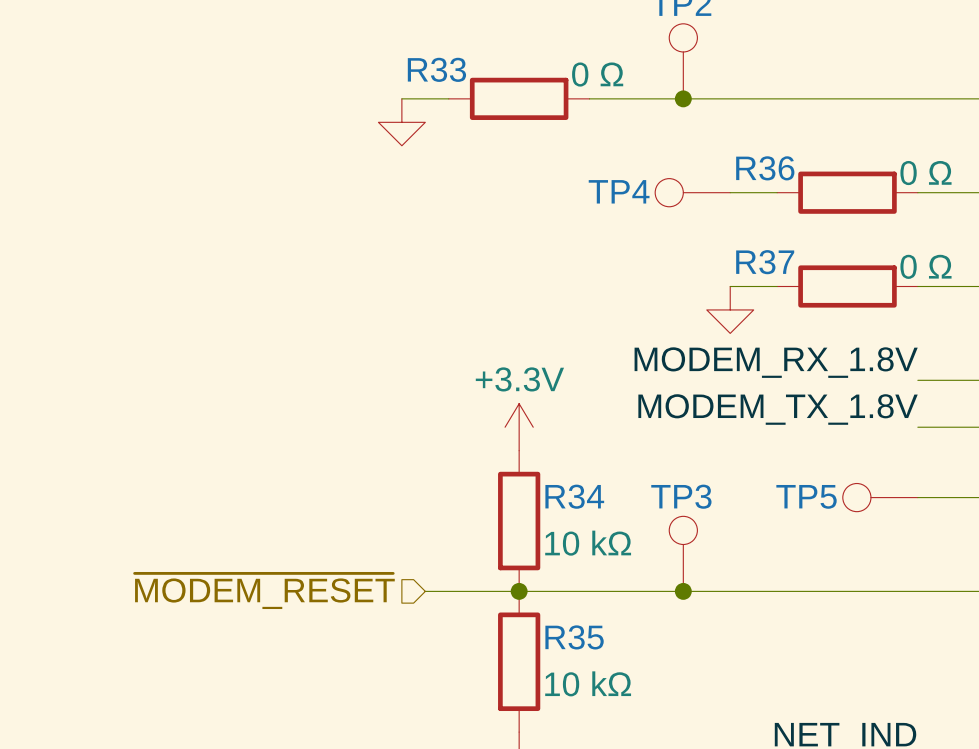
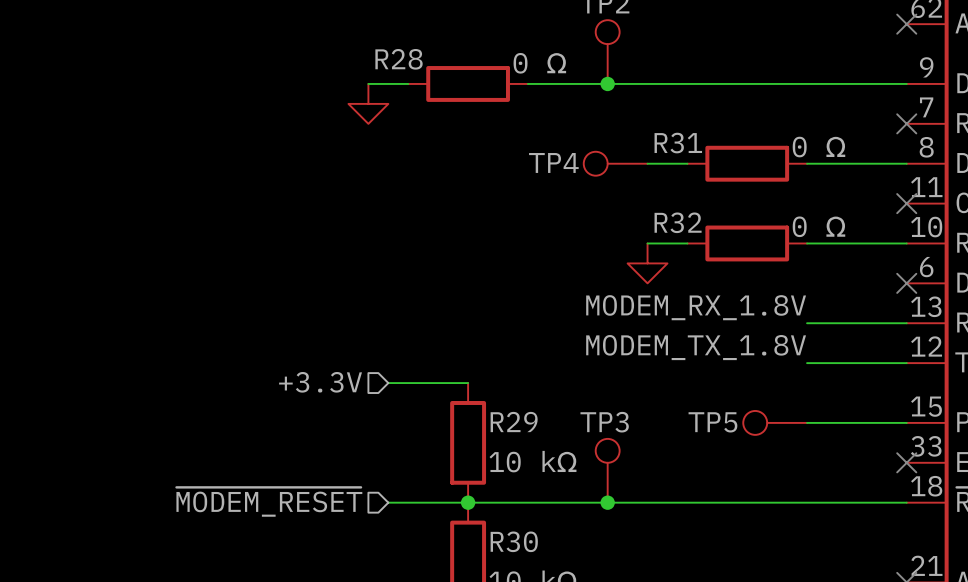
R33 name: R33 (436, 69) -> R28 (399, 59)
R36 name: R36 (765, 168) -> R31 (678, 143)
R37 name: R37 (765, 262) -> R32 (678, 222)
power symbol: +3.3V (519, 427) -> none
hierarchical label: none -> +3.3V (320, 382)
wire: none -> (388, 383) (468, 383)
R34 name: R34 (574, 496) -> R29 (514, 422)
R35 name: R35 (574, 637) -> R30 (514, 541)

